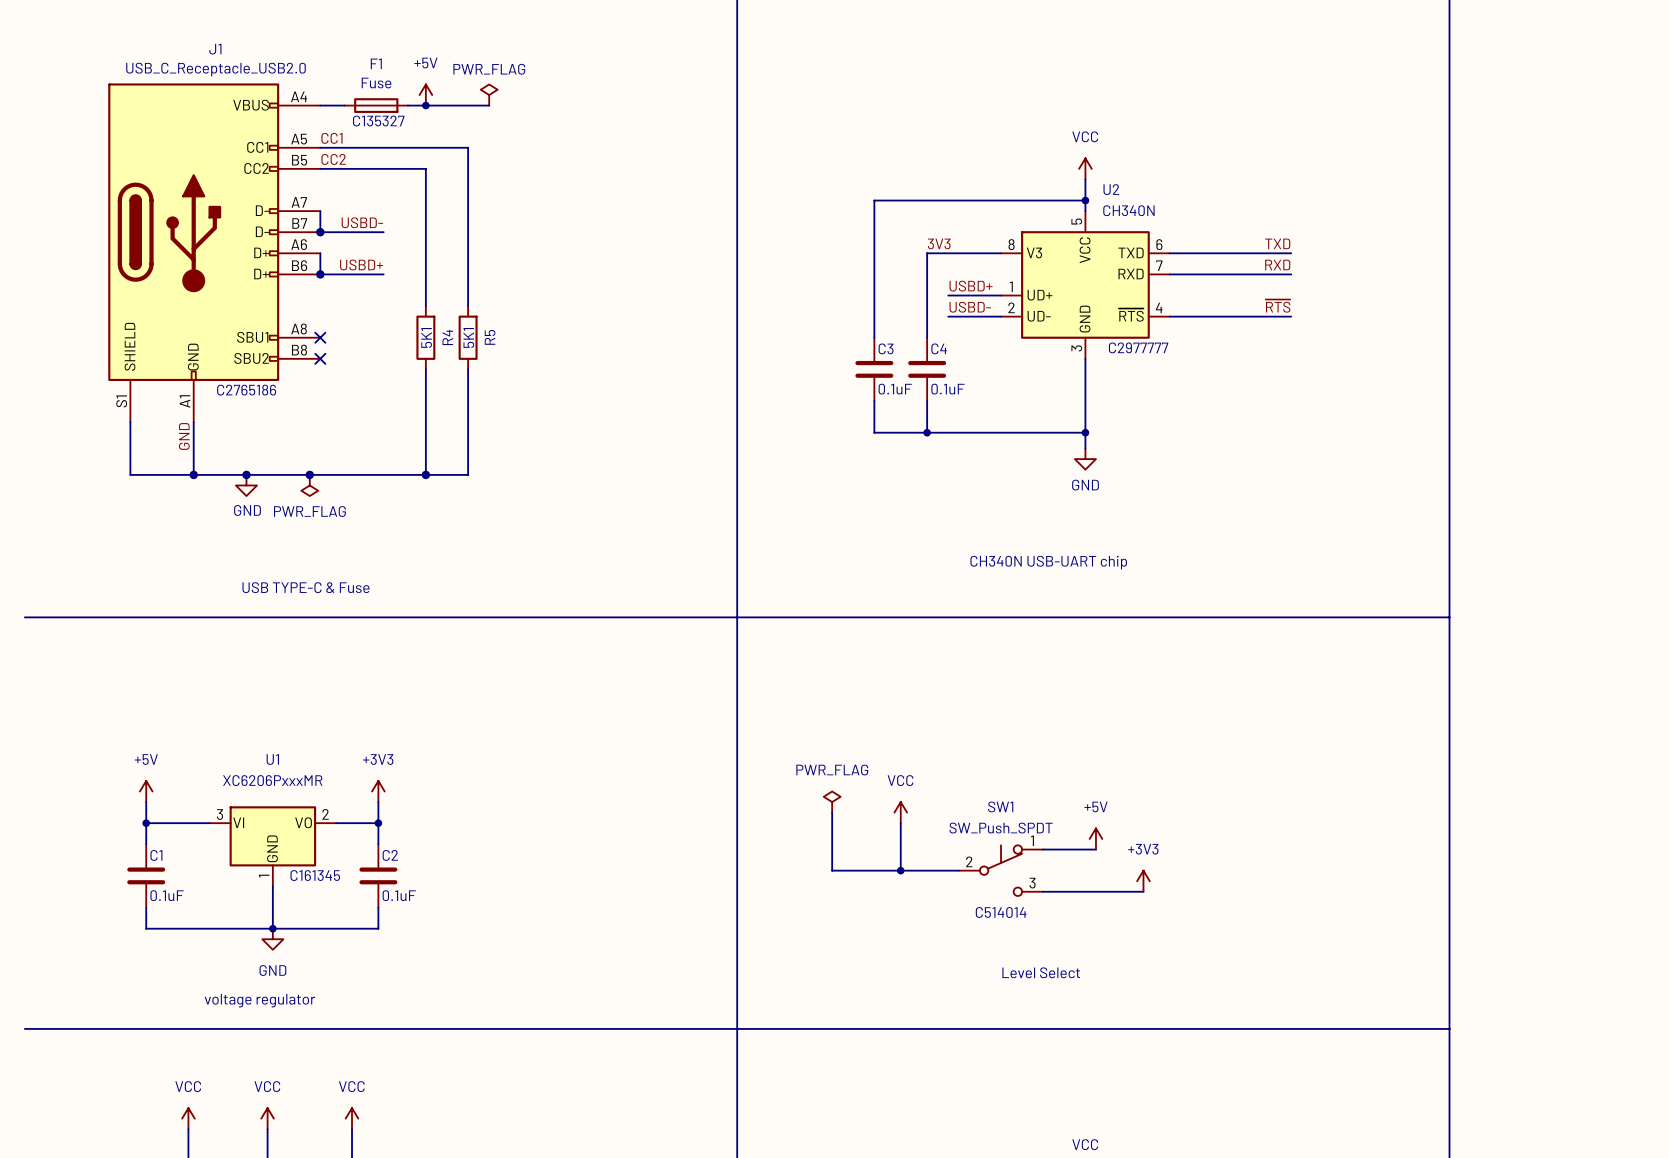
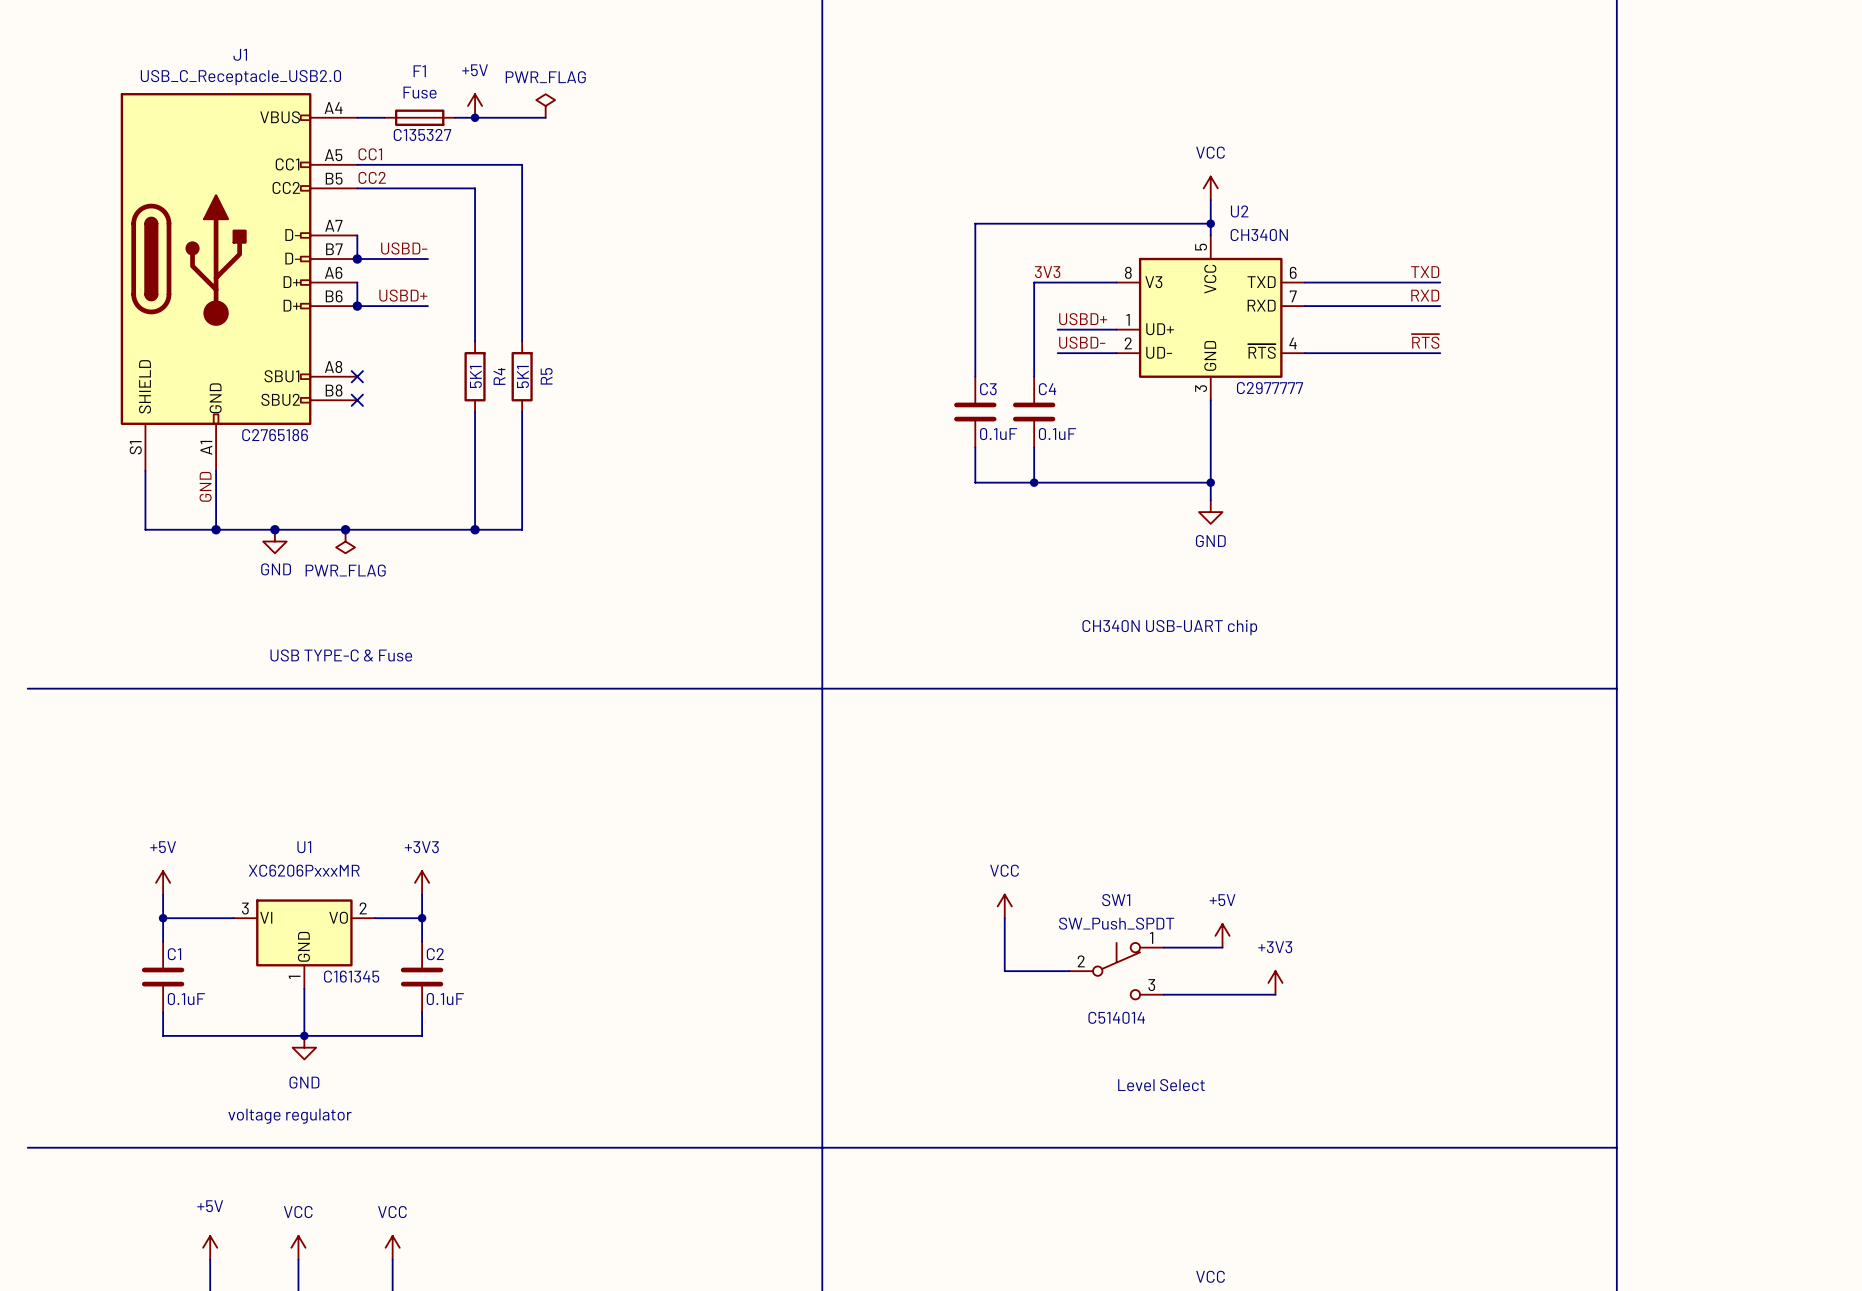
power symbol: PWR_FLAG (832, 802) -> none
wire: (832, 812) (832, 870) (900, 870) -> none
junction: (900, 870) -> none
power symbol: VCC (188, 1118) -> +5V (210, 1247)

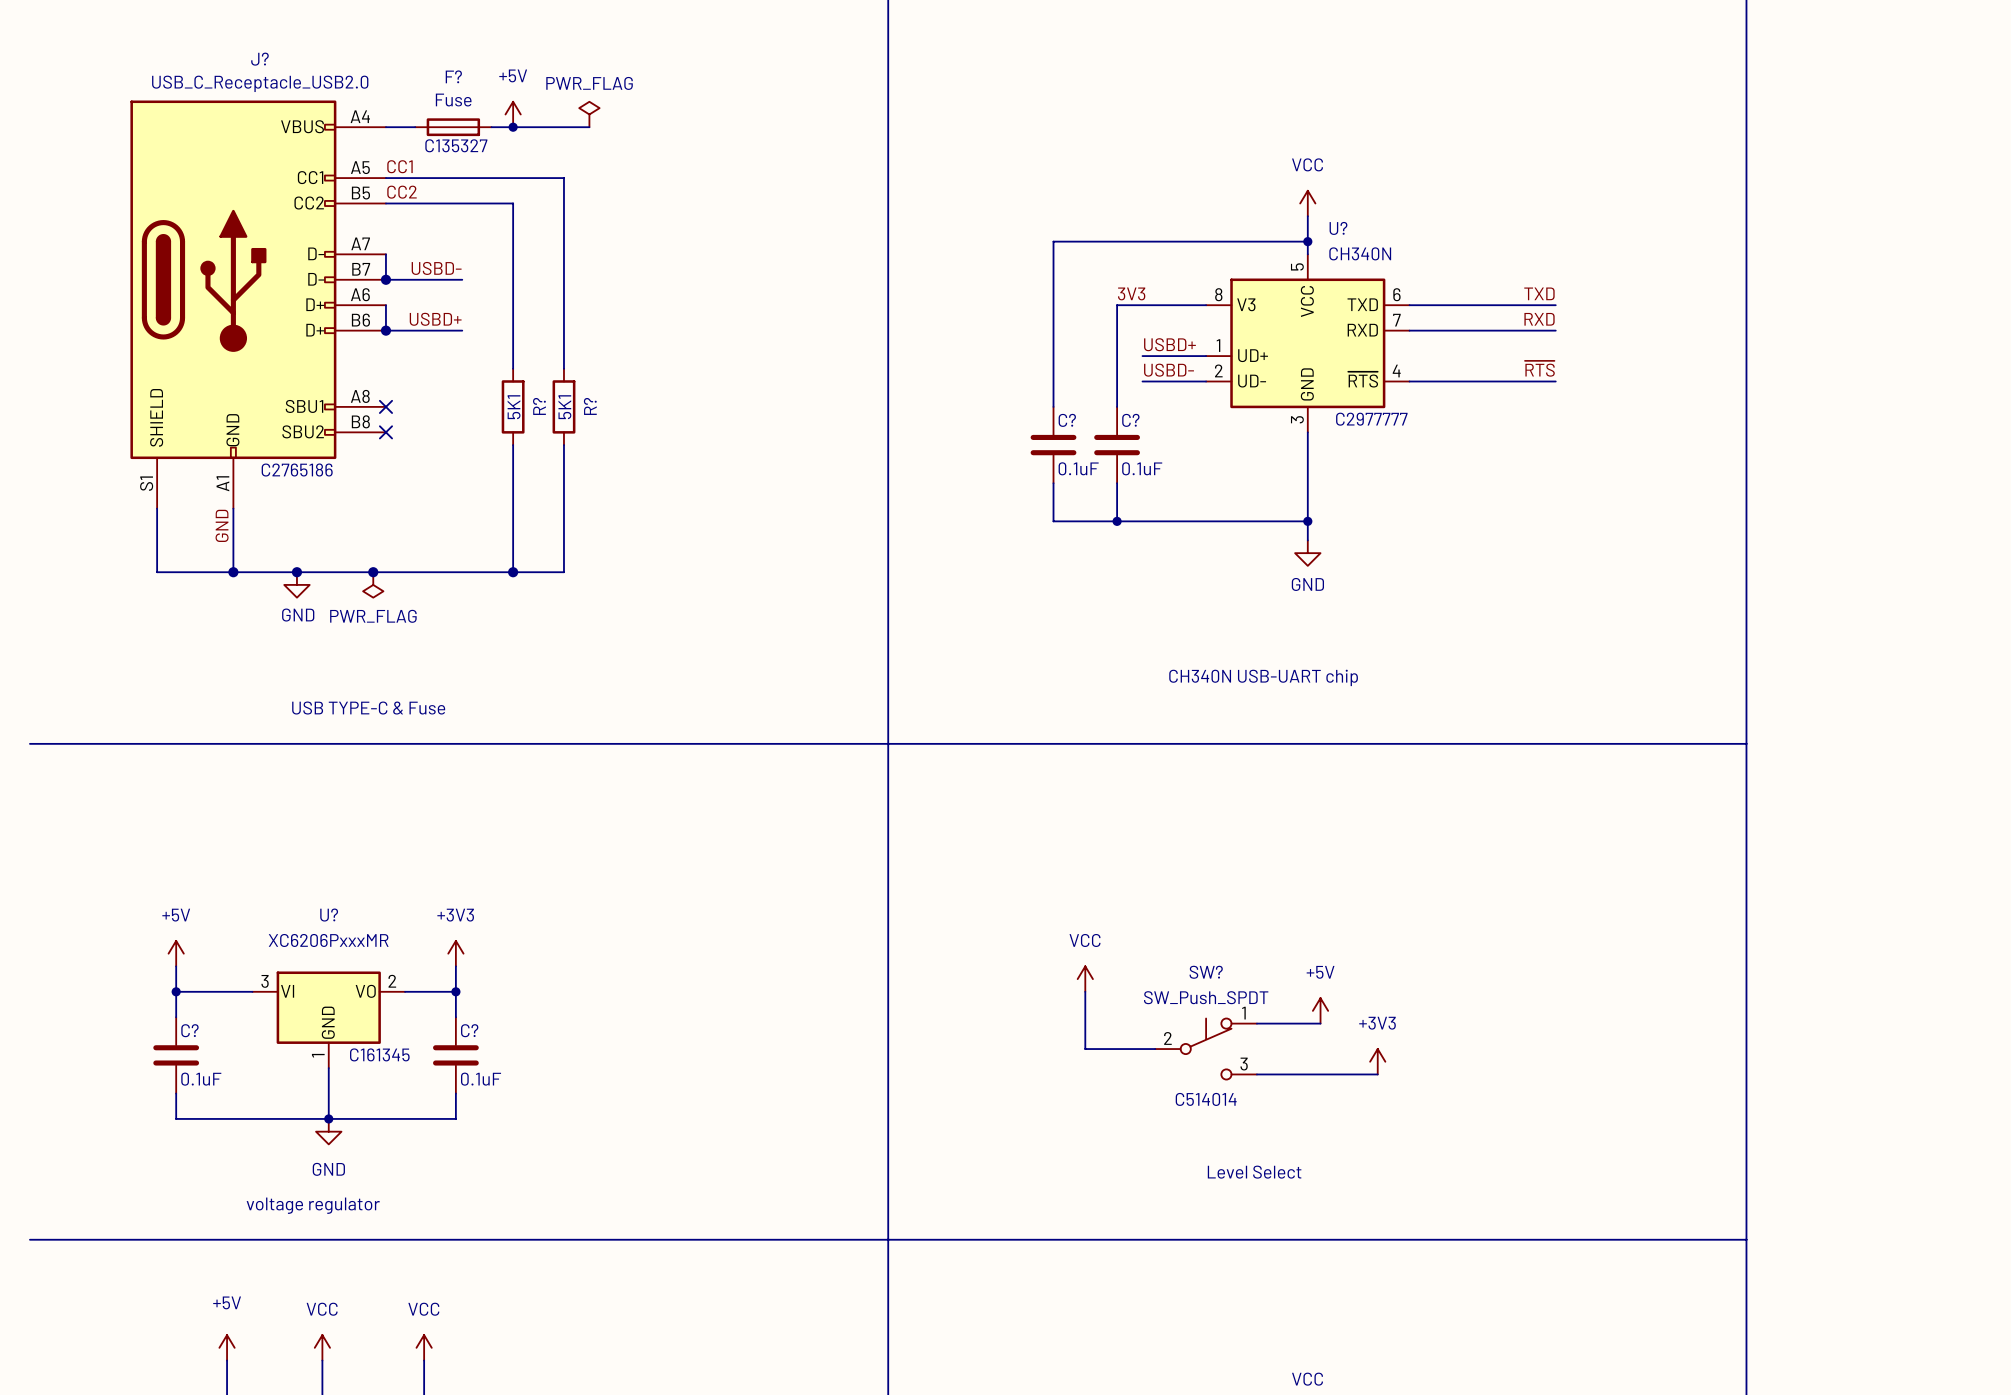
J1 name: J1 (240, 54) -> J? (259, 59)
F1 name: F1 (419, 71) -> F? (453, 76)
U2 name: U2 (1239, 211) -> U? (1338, 228)
R4 name: R4 (499, 376) -> R? (539, 406)
R5 name: R5 (546, 376) -> R? (590, 406)
C3 name: C3 (988, 389) -> C? (1067, 420)
C4 name: C4 (1047, 389) -> C? (1130, 420)
U1 name: U1 (304, 847) -> U? (329, 915)
SW1 name: SW1 (1116, 900) -> SW? (1206, 972)
C1 name: C1 (174, 954) -> C? (189, 1030)
C2 name: C2 (435, 954) -> C? (469, 1030)

